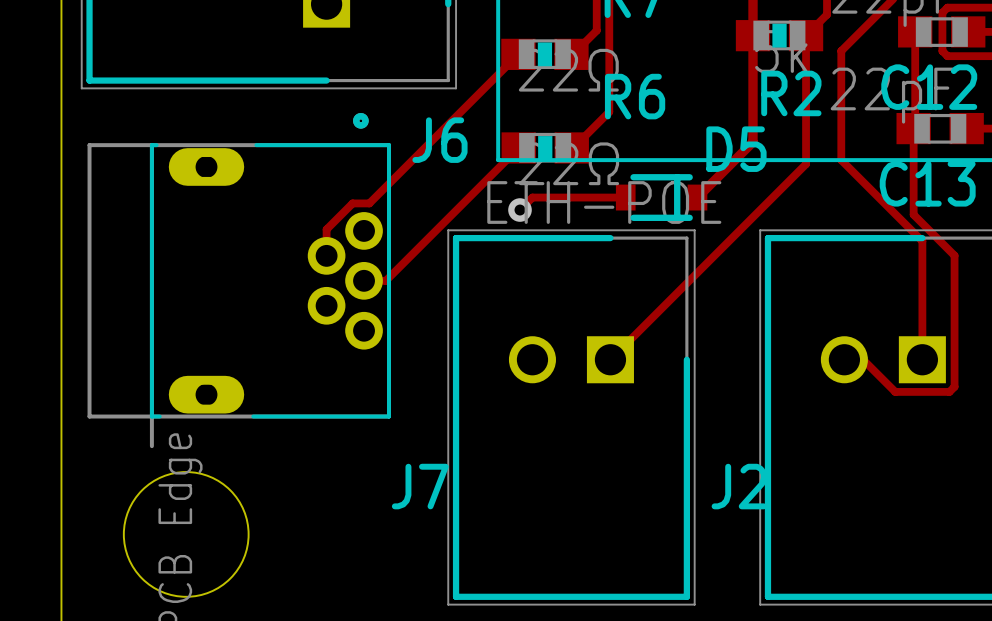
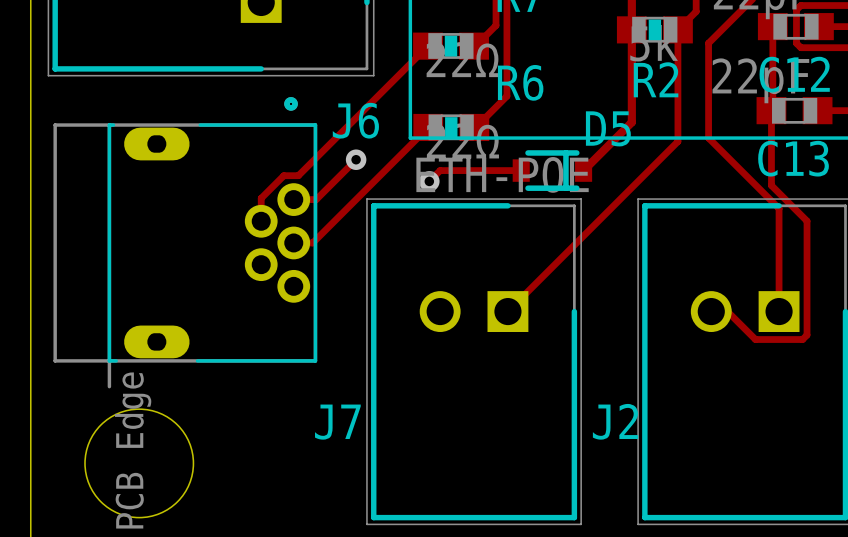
track: none -> (356, 159) (316, 199) (293, 199)
via: none -> (356, 159)

